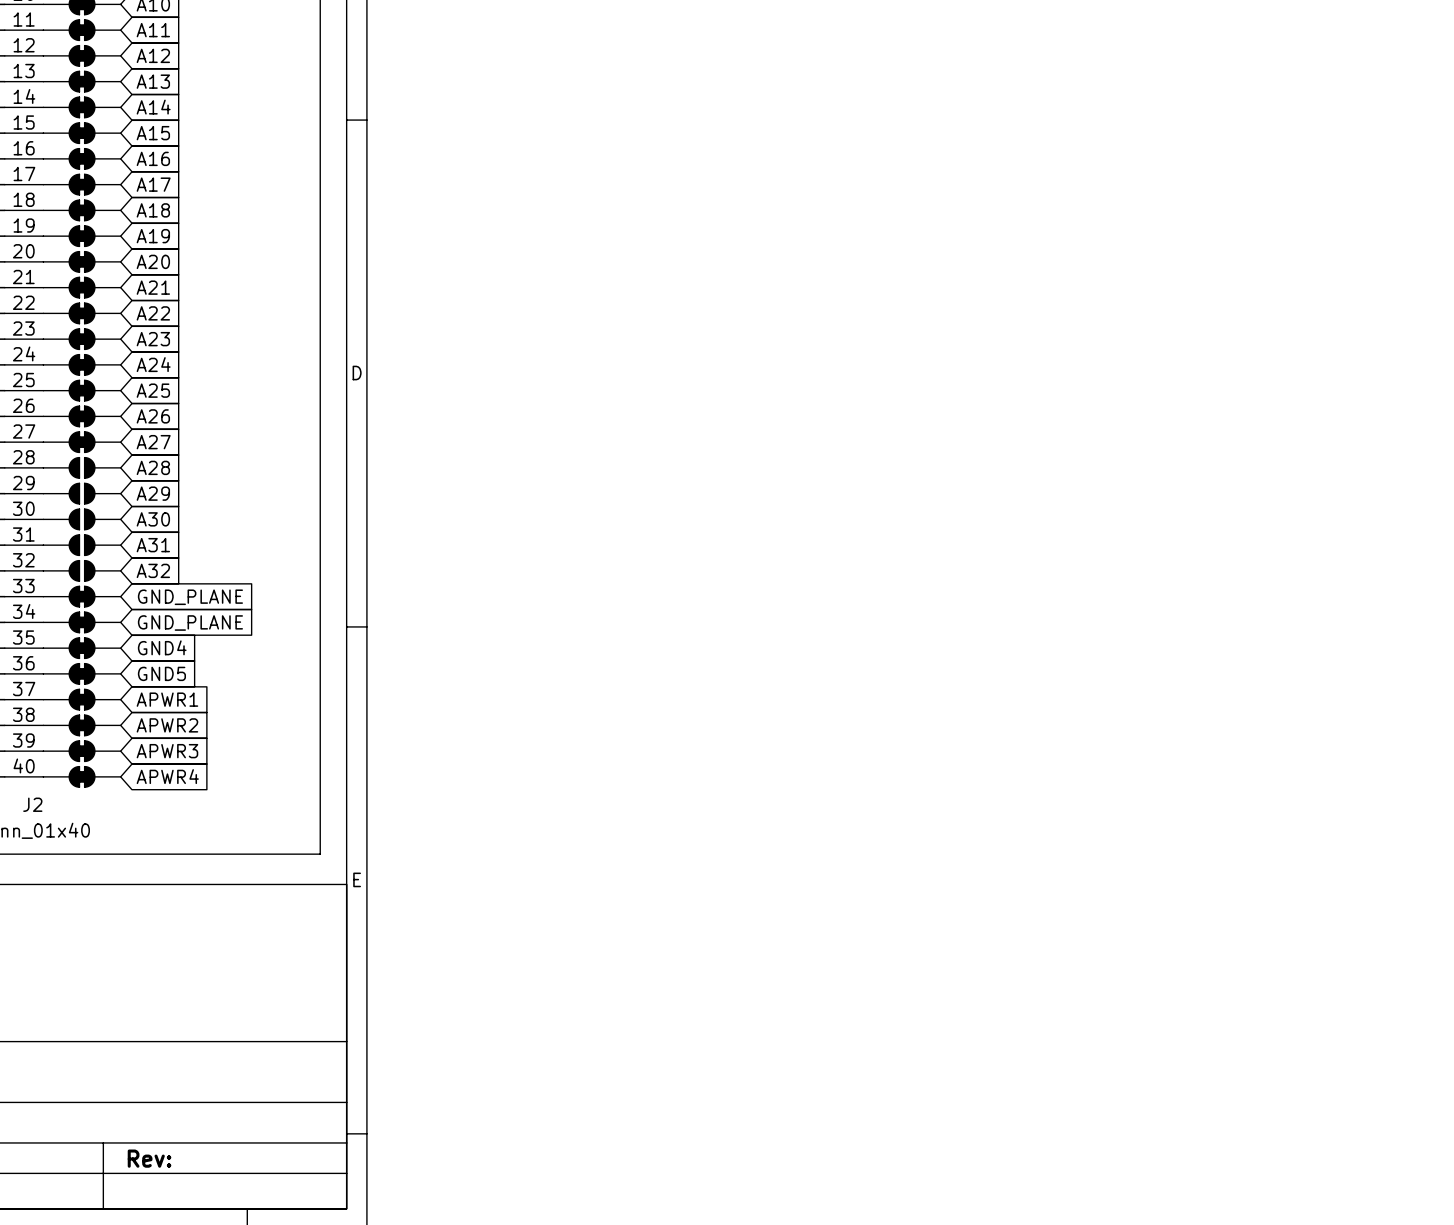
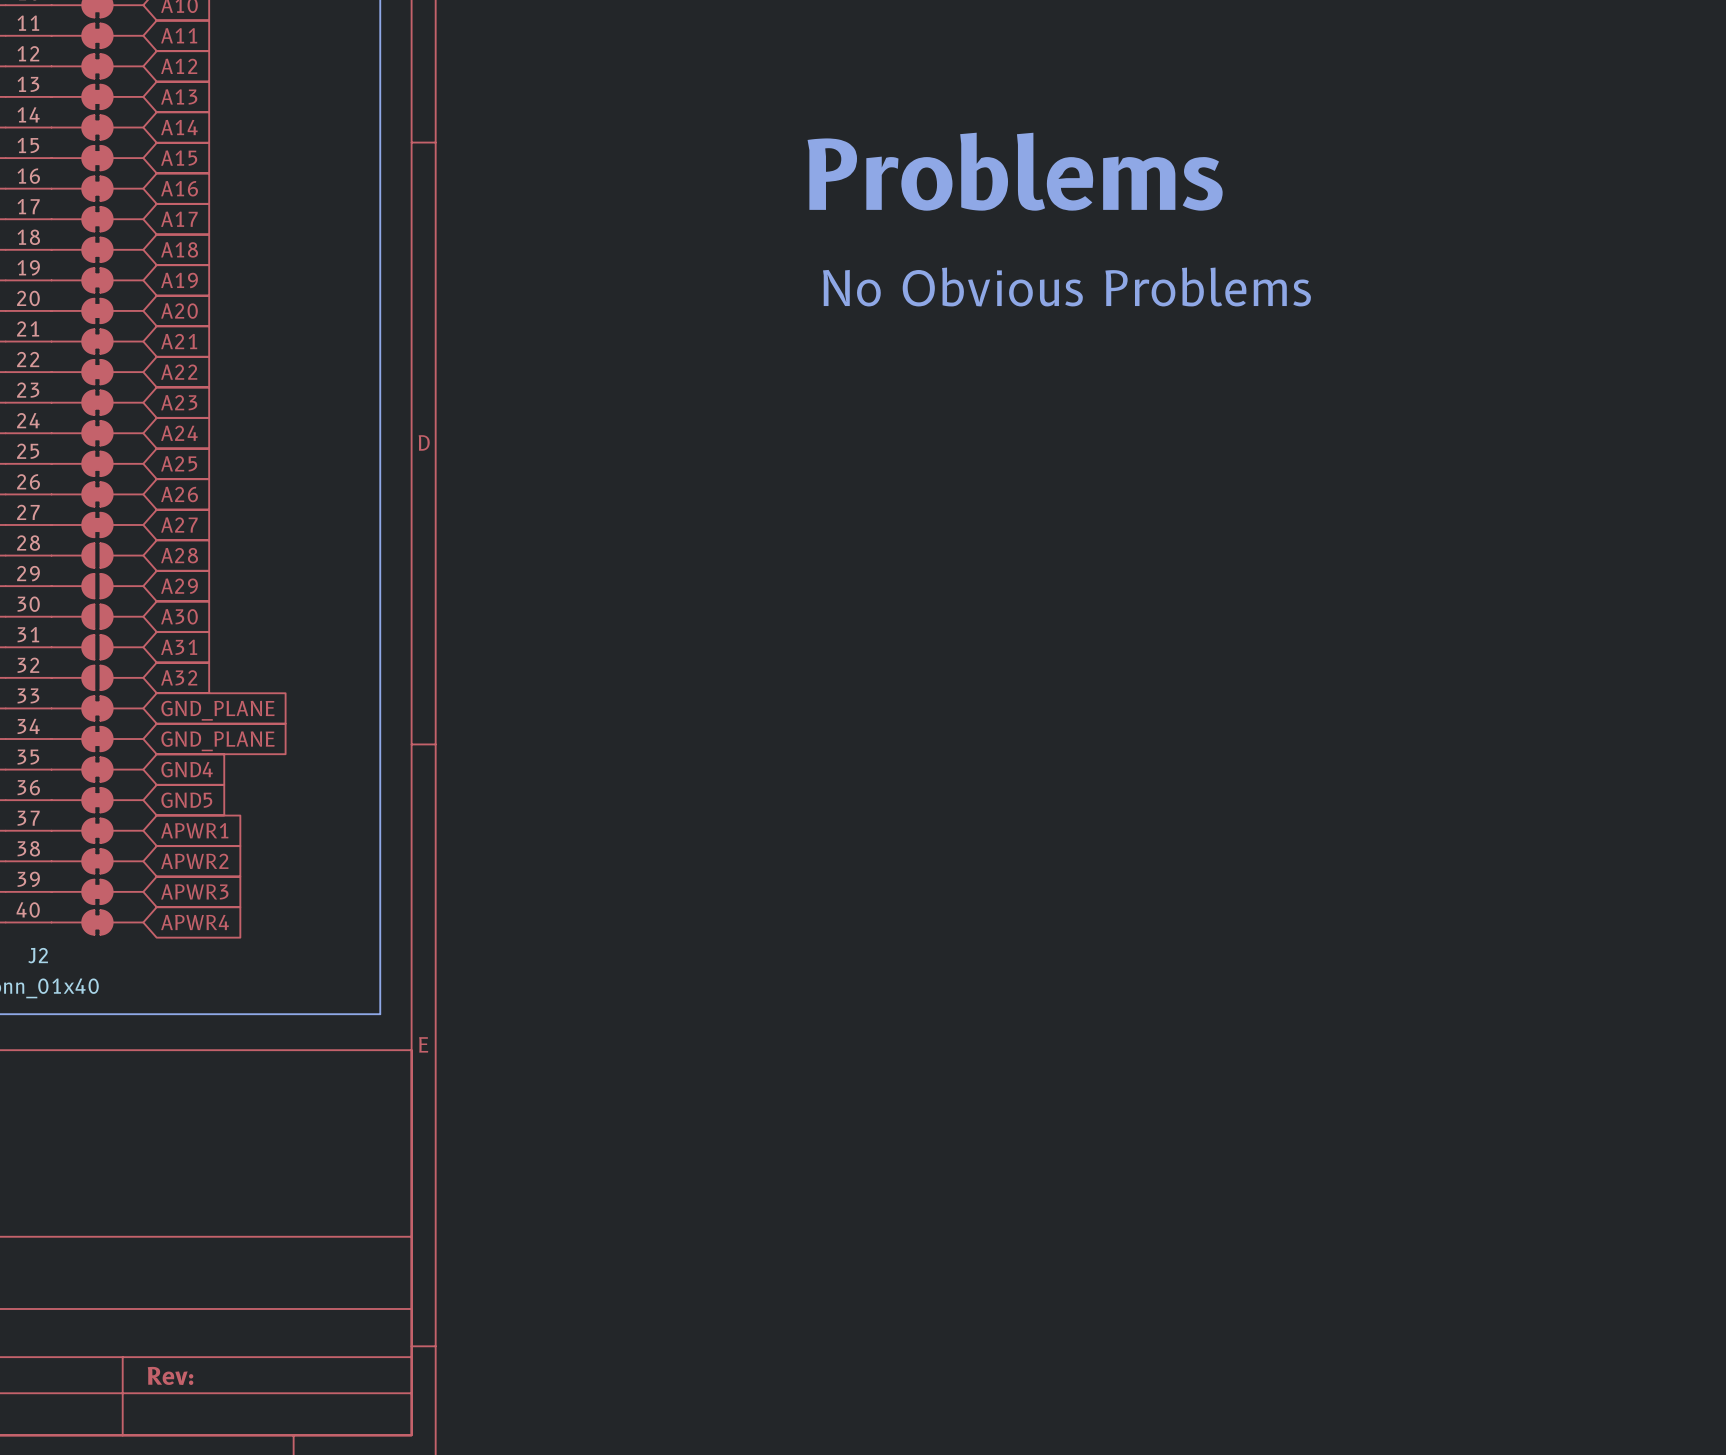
text: none -> Problems (1015, 171)
text: none -> No Obvious Problems (1066, 287)

